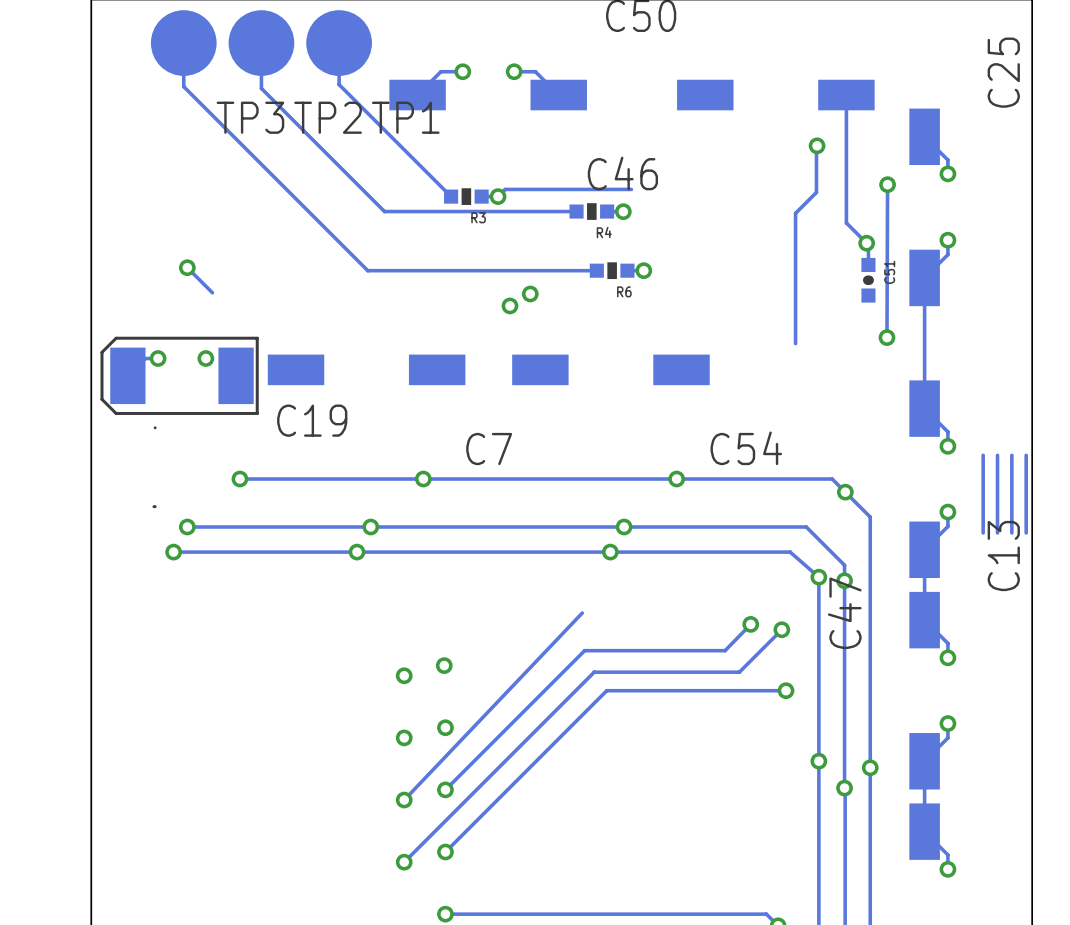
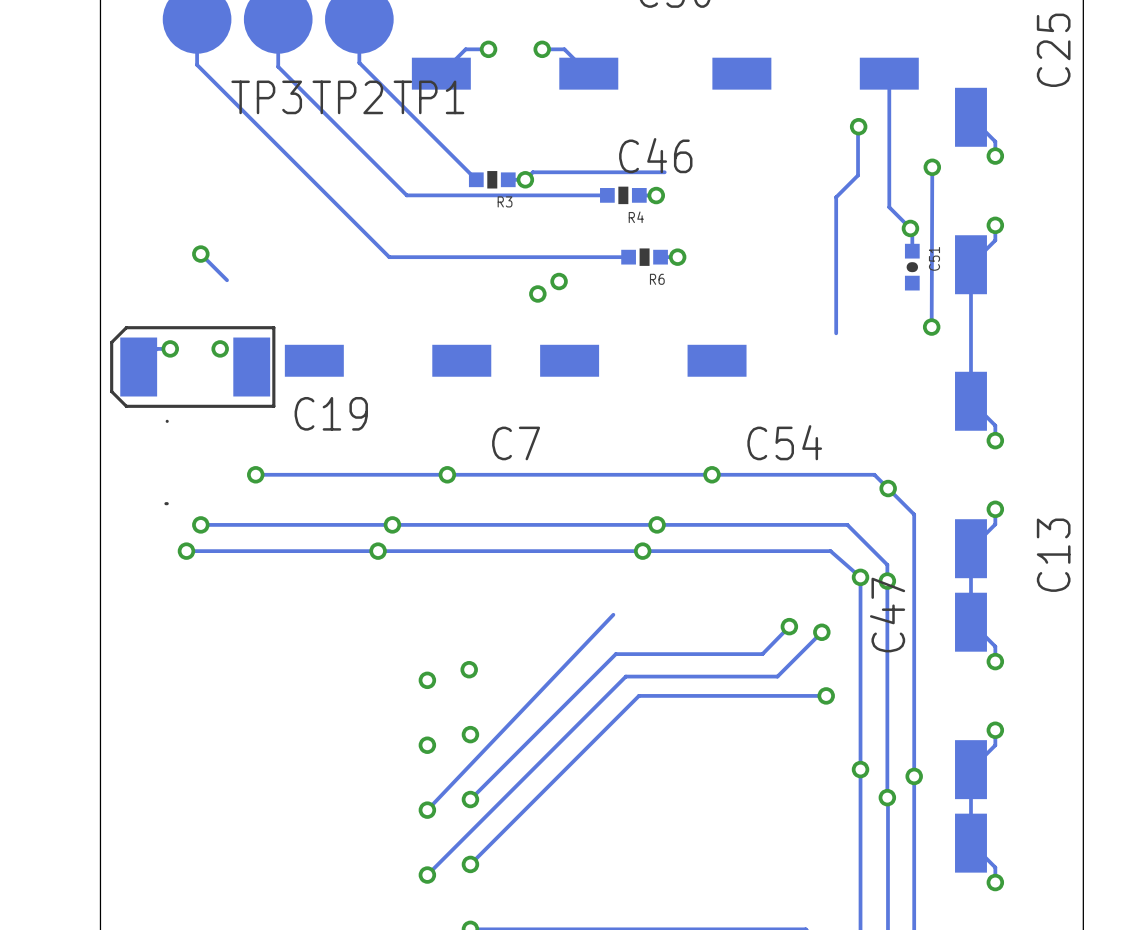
track: (983, 455) (983, 532) -> none
track: (997, 455) (997, 532) -> none
track: (1011, 455) (1011, 532) -> none
track: (1026, 455) (1026, 532) -> none

